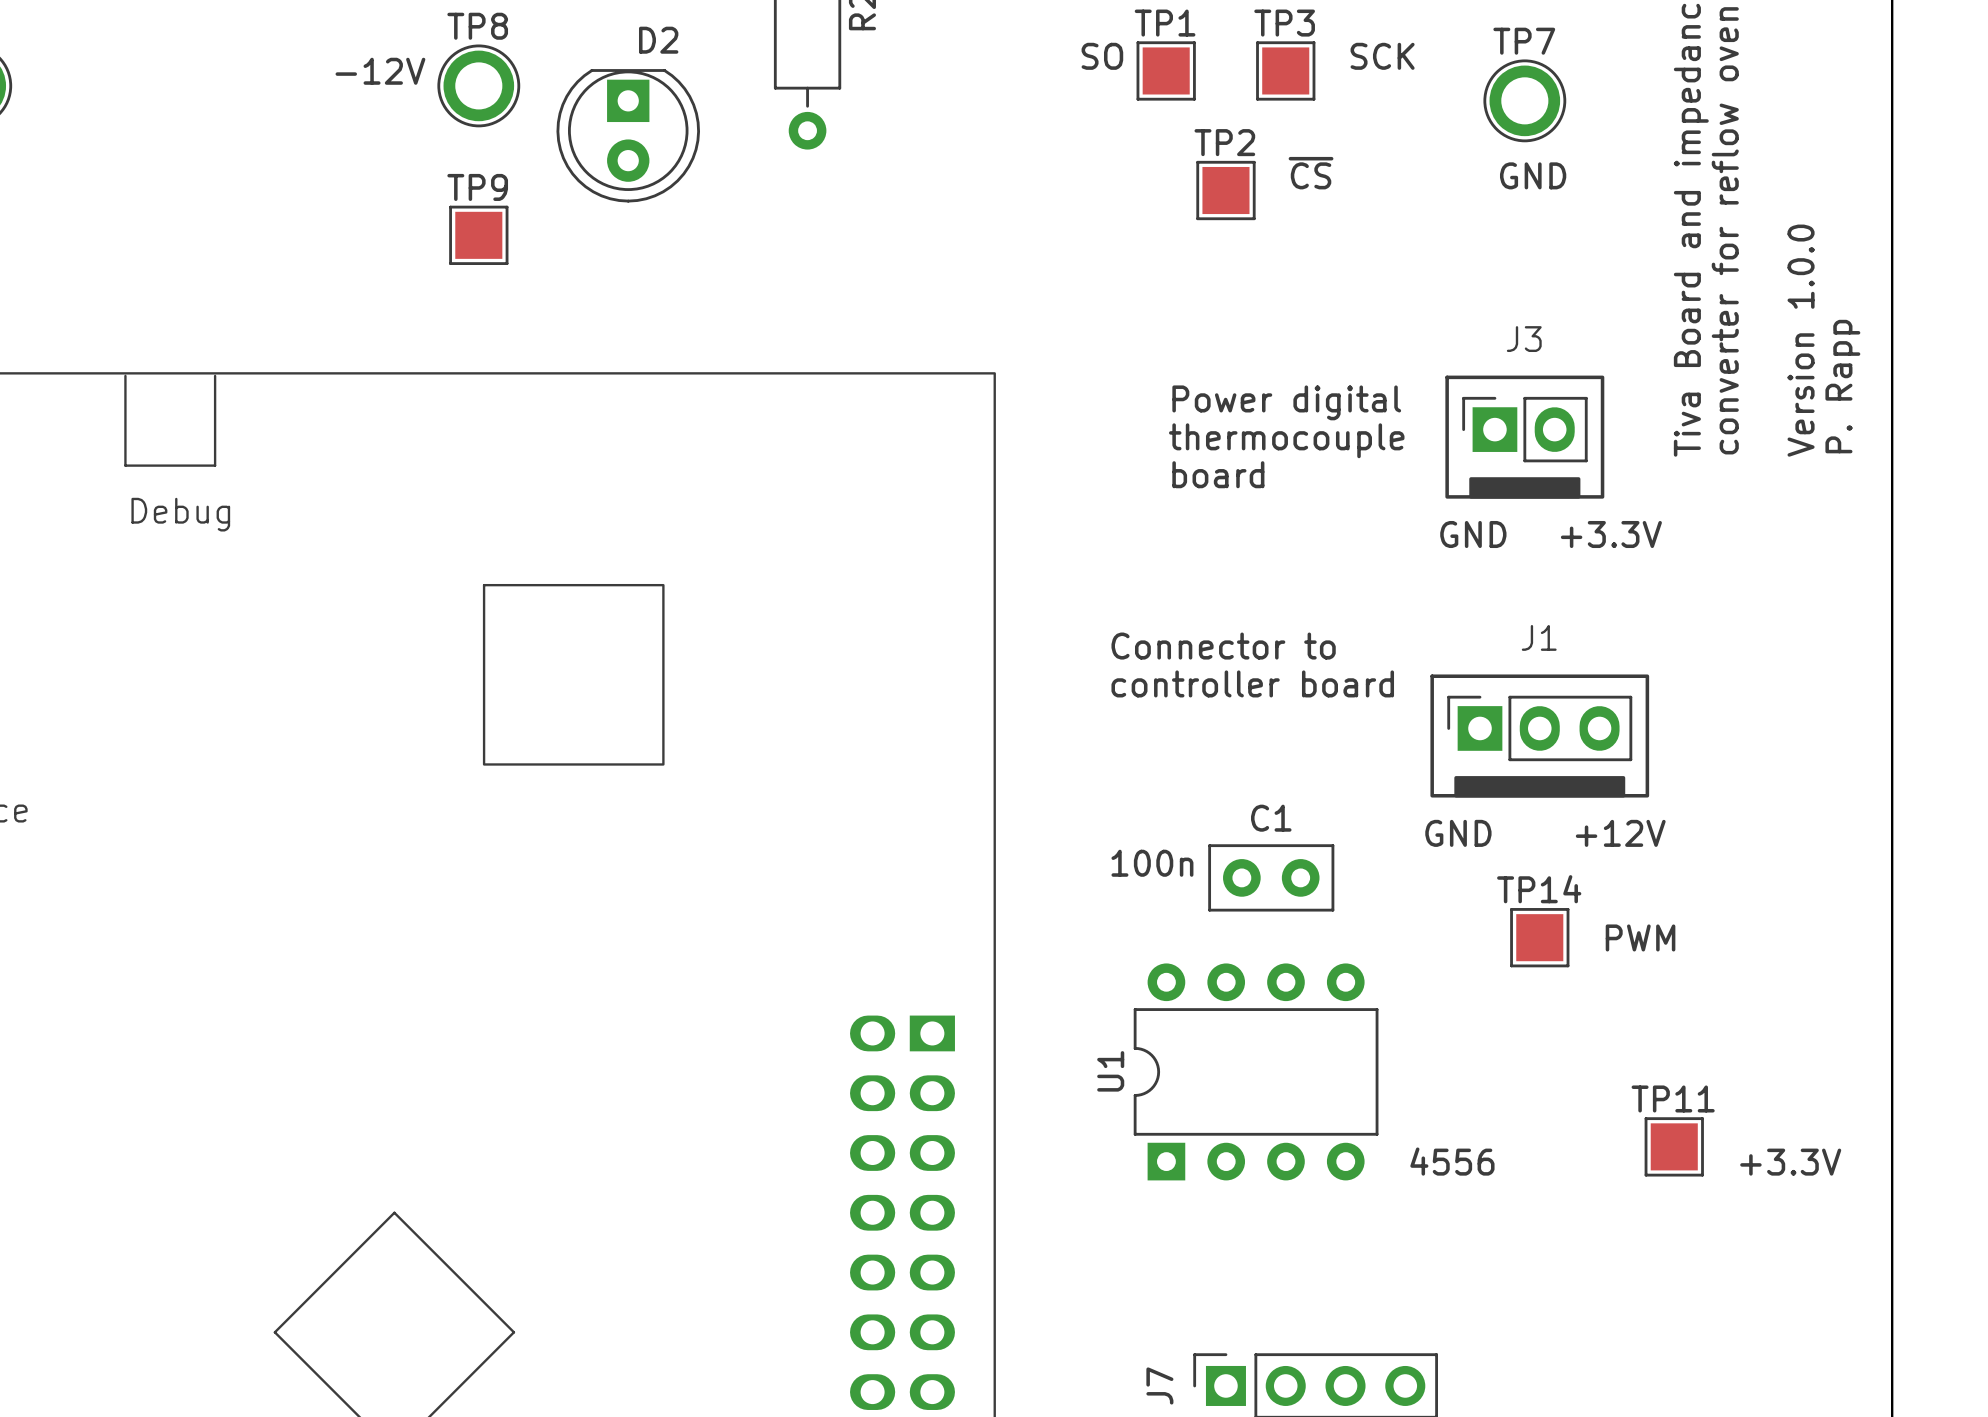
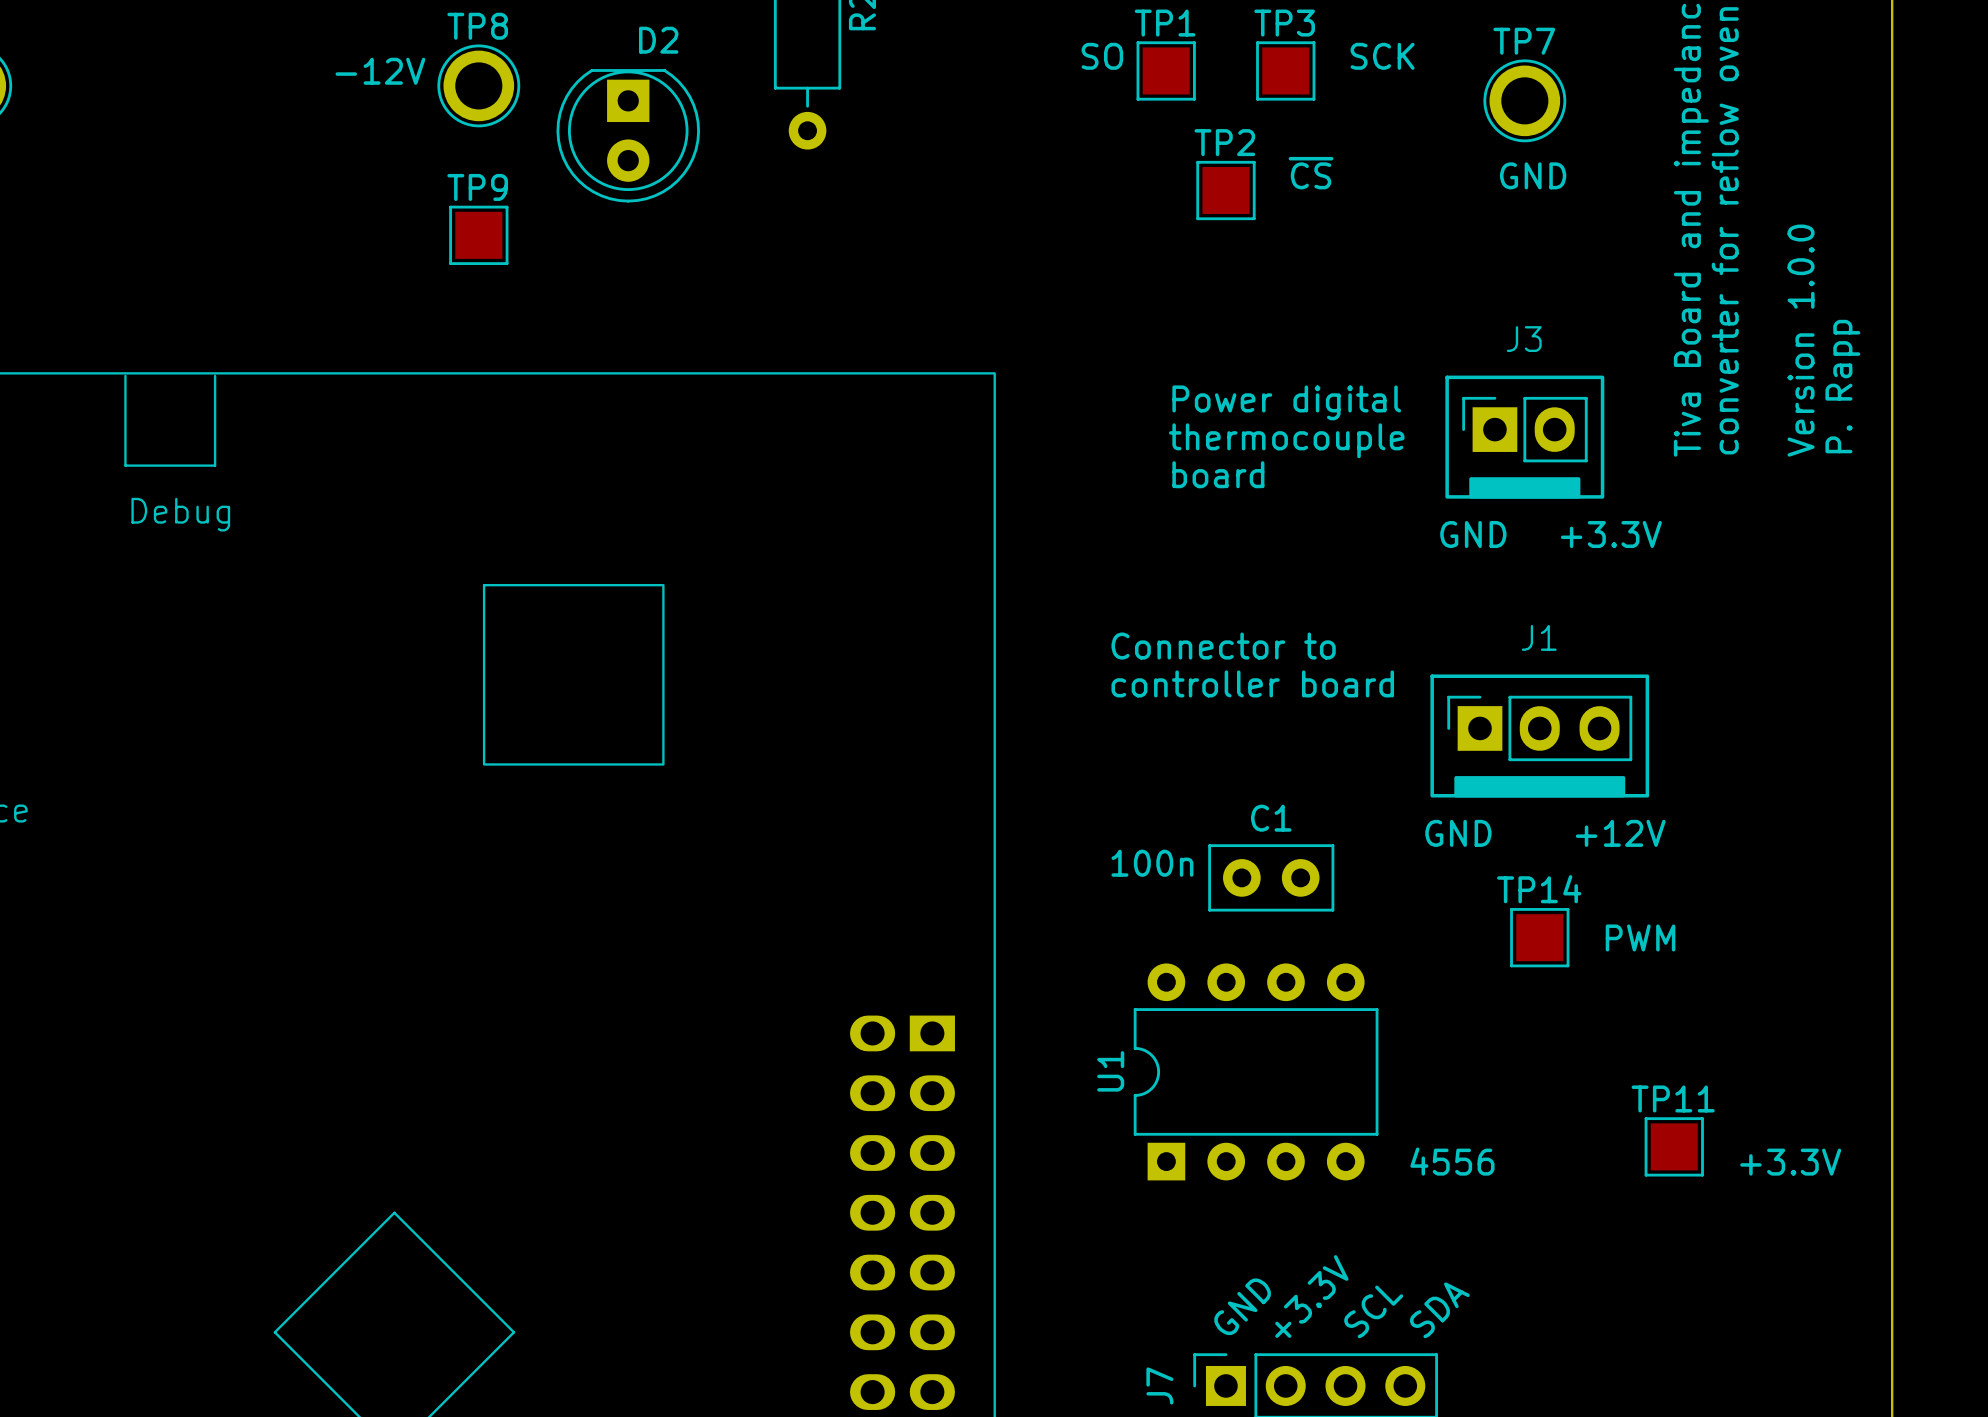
text: none -> +3.3V (1311, 1296)
text: none -> GND (1242, 1306)
text: none -> SDA (1439, 1310)
text: none -> SCL (1373, 1311)

